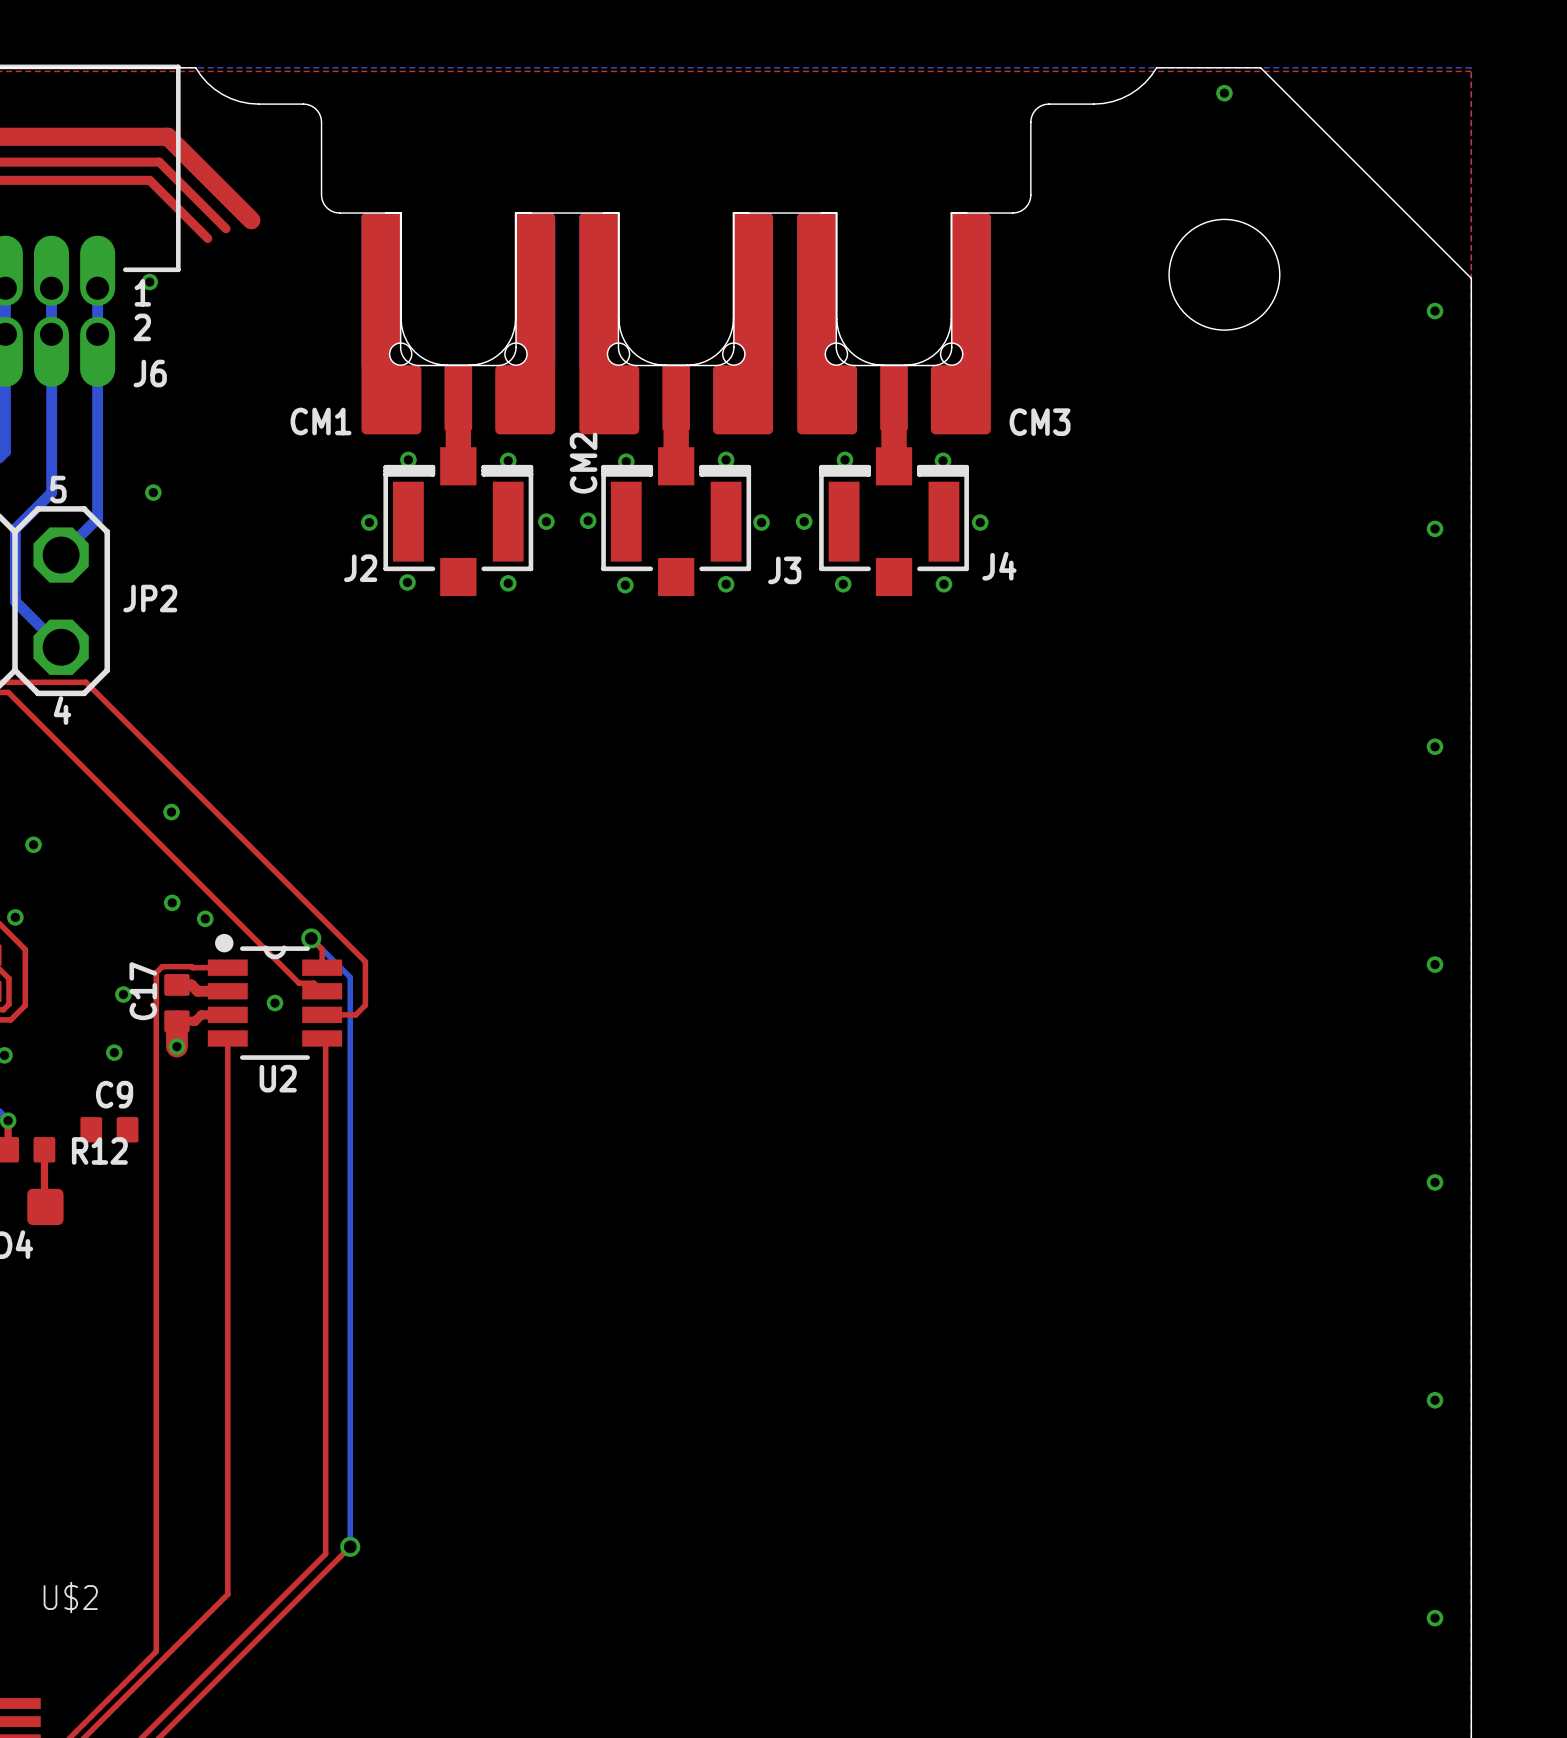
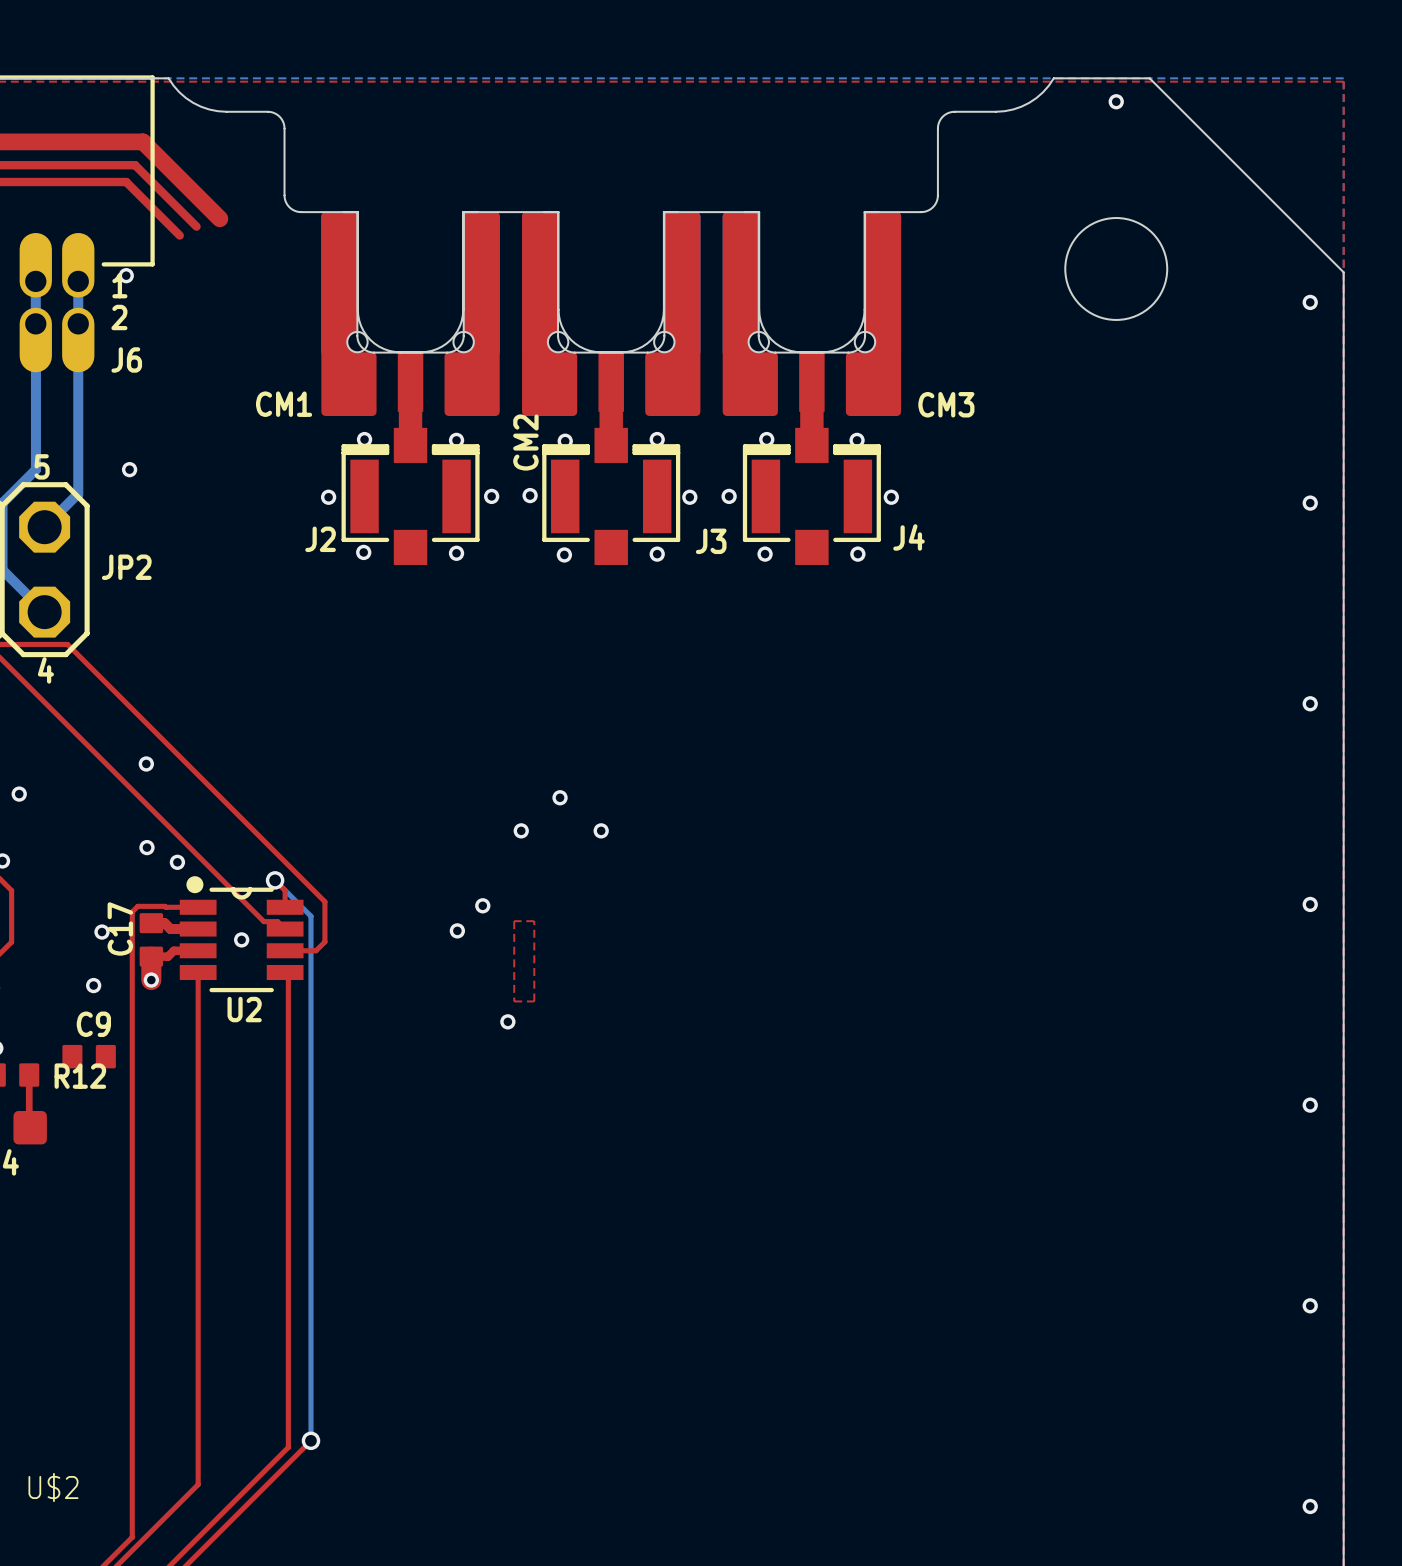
via: none -> (560, 797)
via: none -> (521, 830)
via: none -> (601, 830)
via: none -> (482, 905)
top zone outline: none -> (514, 921) (514, 1001) (534, 1001) (534, 921) (514, 921)
via: none -> (457, 930)
via: none -> (507, 1021)

